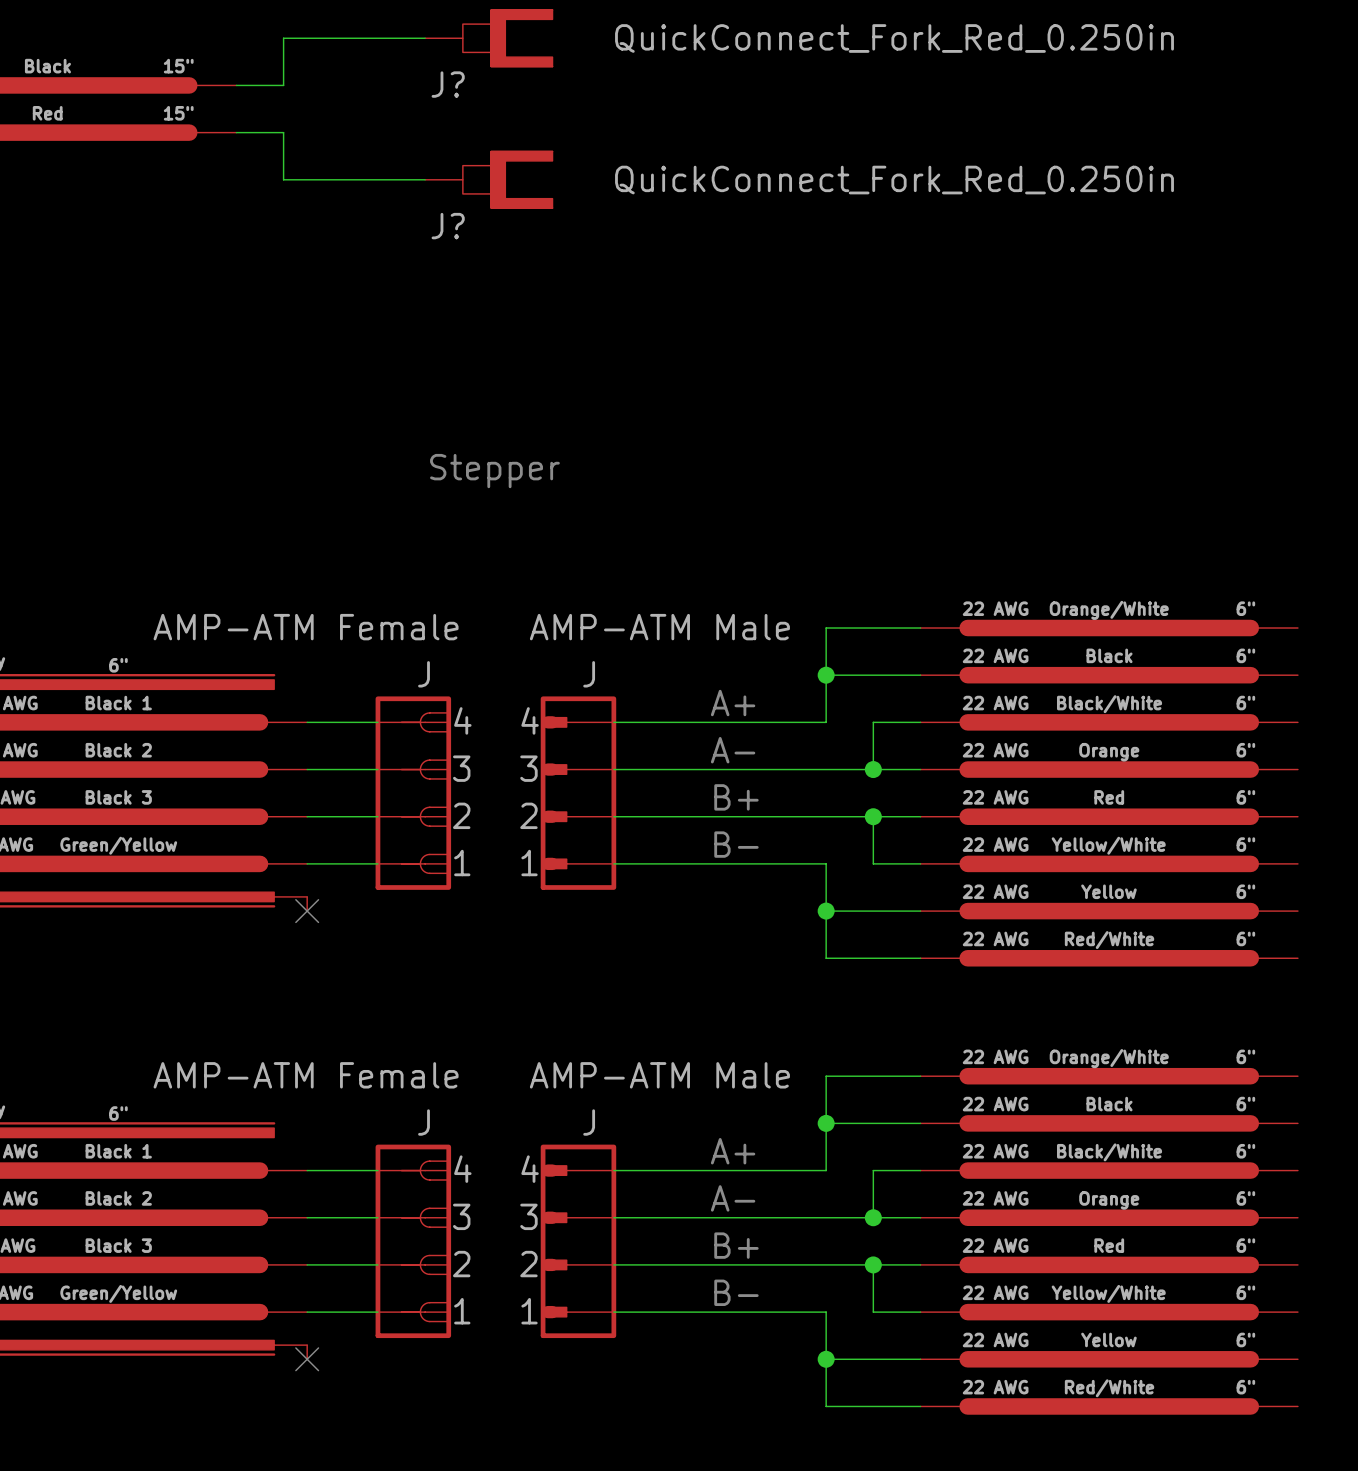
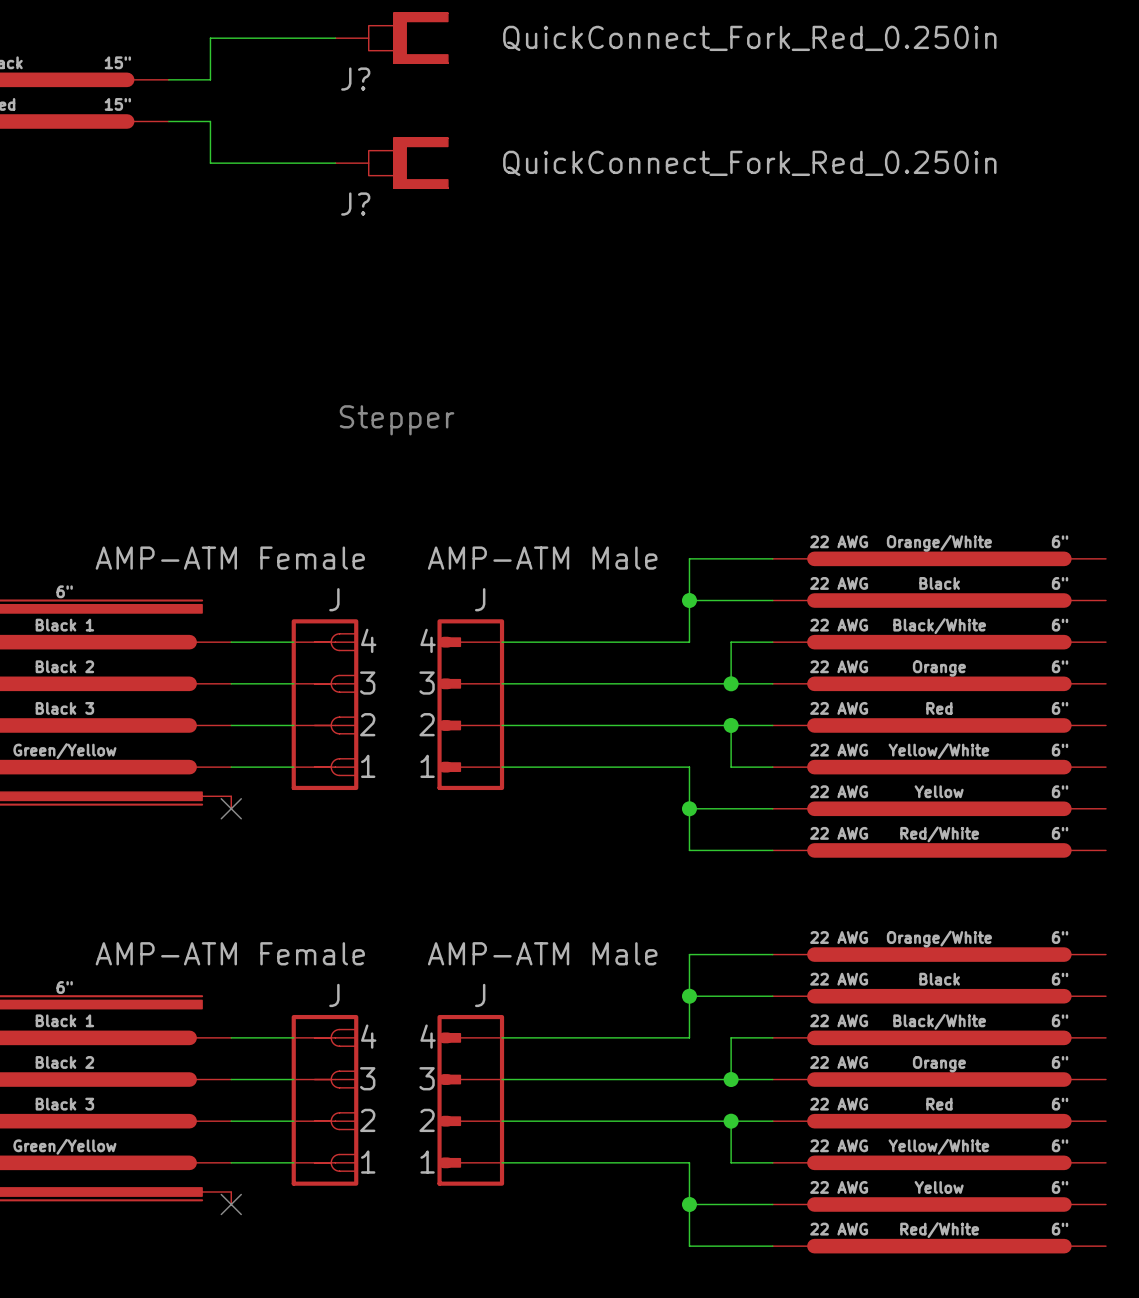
text: A+ (733, 703) -> none
text: A- (733, 750) -> none
text: B+ (736, 797) -> none
text: B- (736, 844) -> none
text: A+ (733, 1151) -> none
text: A- (733, 1198) -> none
text: B+ (736, 1245) -> none
text: B- (736, 1292) -> none

